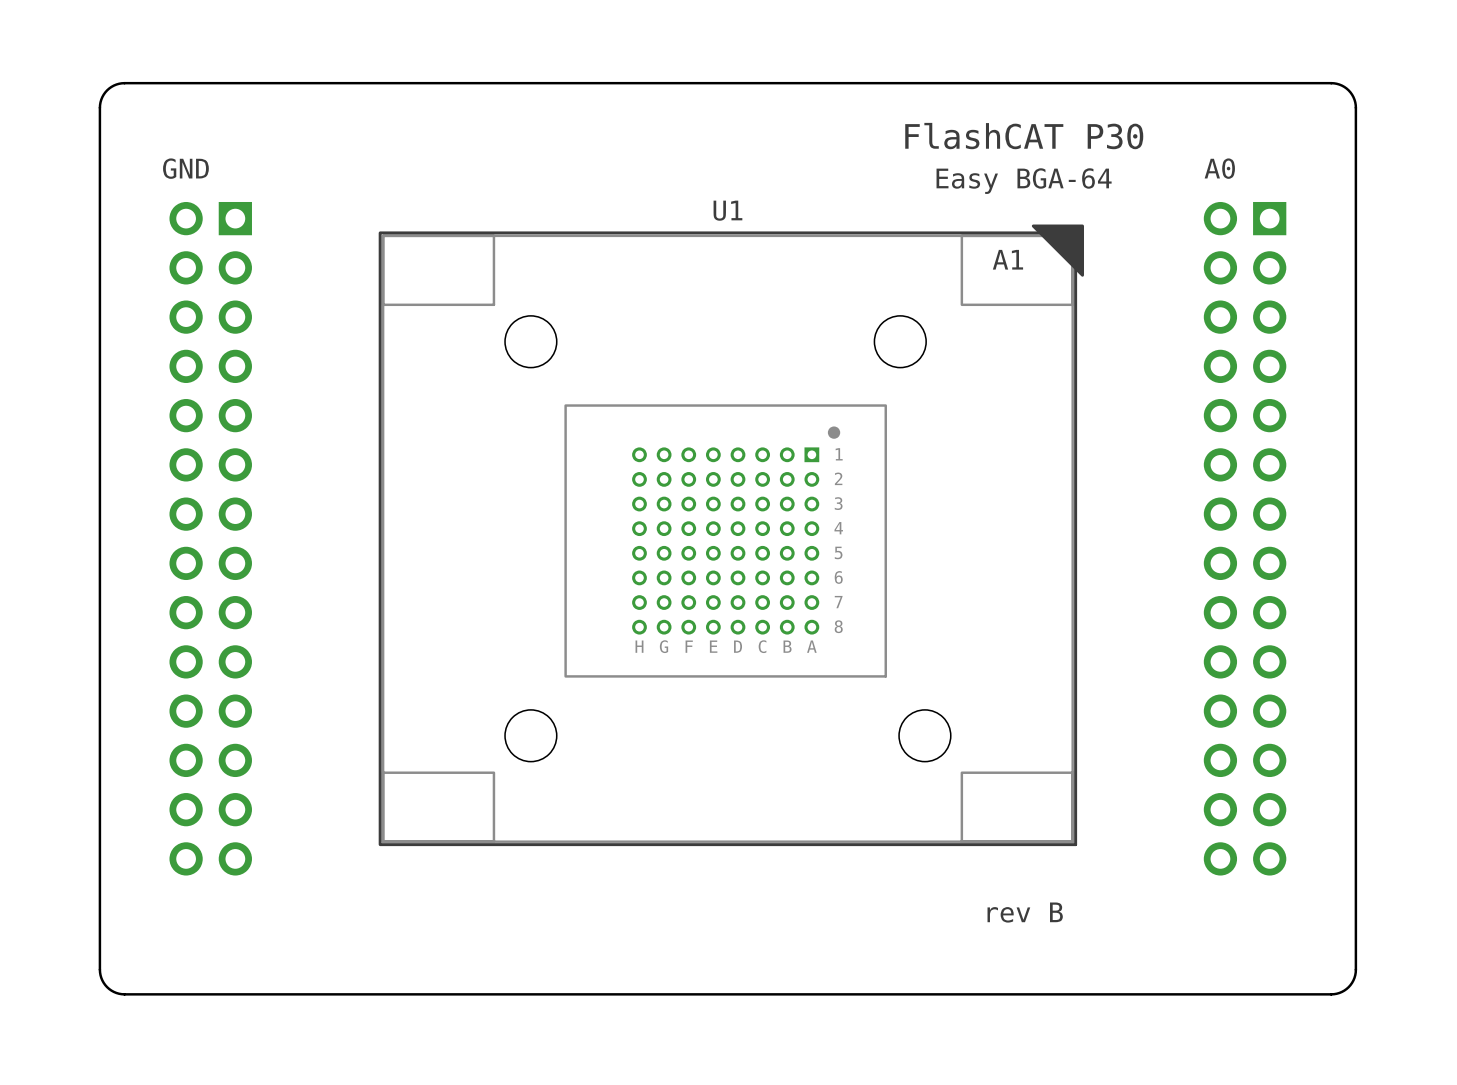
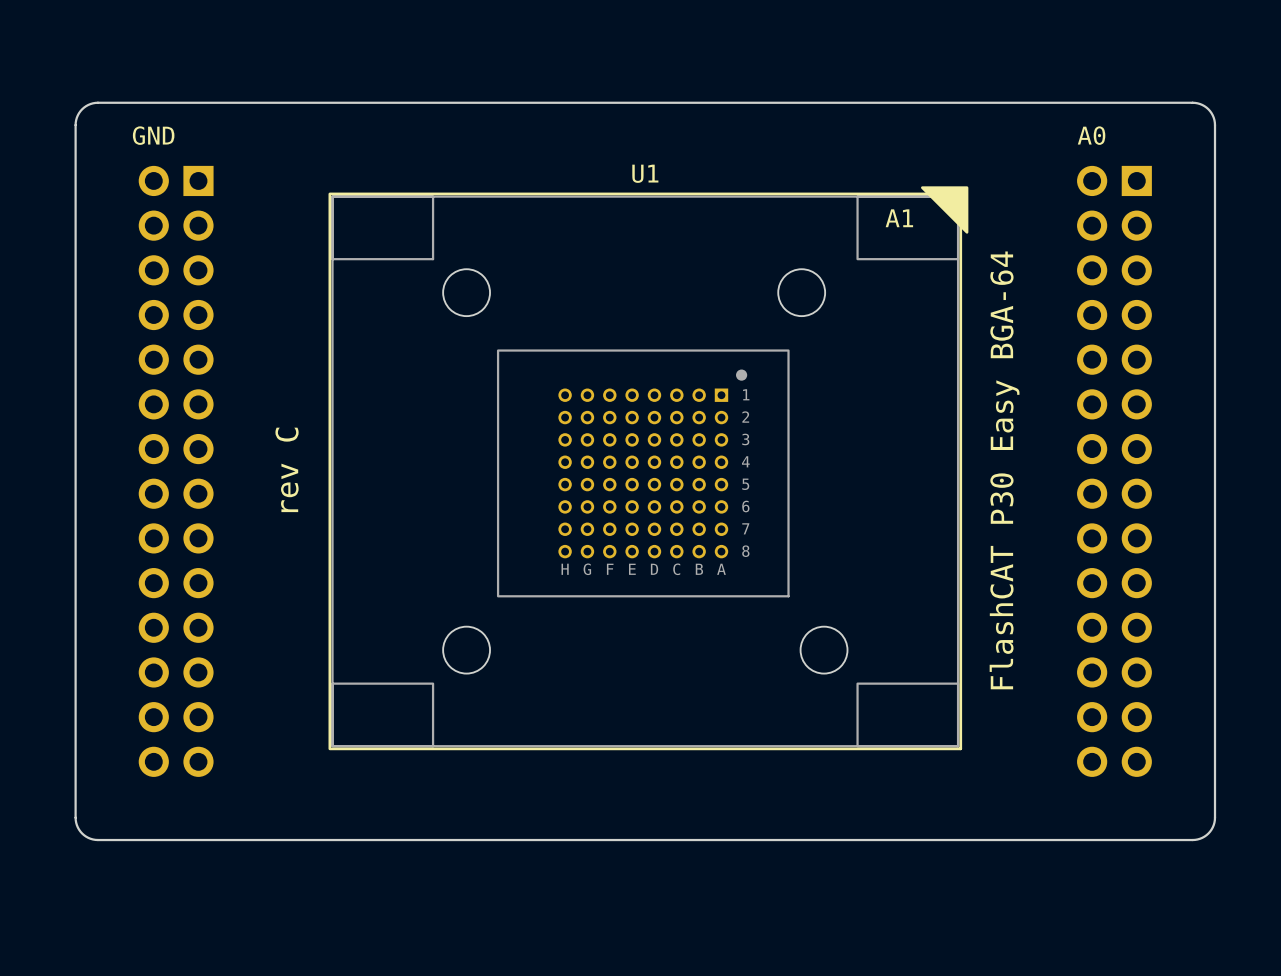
text: FlashCAT P30 (1024, 136) -> none
board edge: (99, 157) (101, 99) (109, 88) (124, 83) (1334, 83) (1346, 88) (1354, 99) (1355, 157) -> (75, 125) (77, 115) (82, 109) (88, 104) (97, 102) (1192, 102) (1202, 104) (1208, 109) (1213, 117) (1215, 125)
text: Easy BGA-64 (1024, 181) -> none
text: none -> rev C (287, 469)
text: none -> FlashCAT P30 Easy BGA-64 (1004, 470)
text: rev B (1025, 912) -> none
board edge: (99, 920) (101, 977) (111, 990) (124, 994) (1334, 994) (1346, 988) (1354, 977) (1355, 920) -> (75, 817) (77, 827) (82, 833) (90, 838) (97, 840) (1192, 840) (1202, 837) (1208, 833) (1212, 827) (1215, 817)

